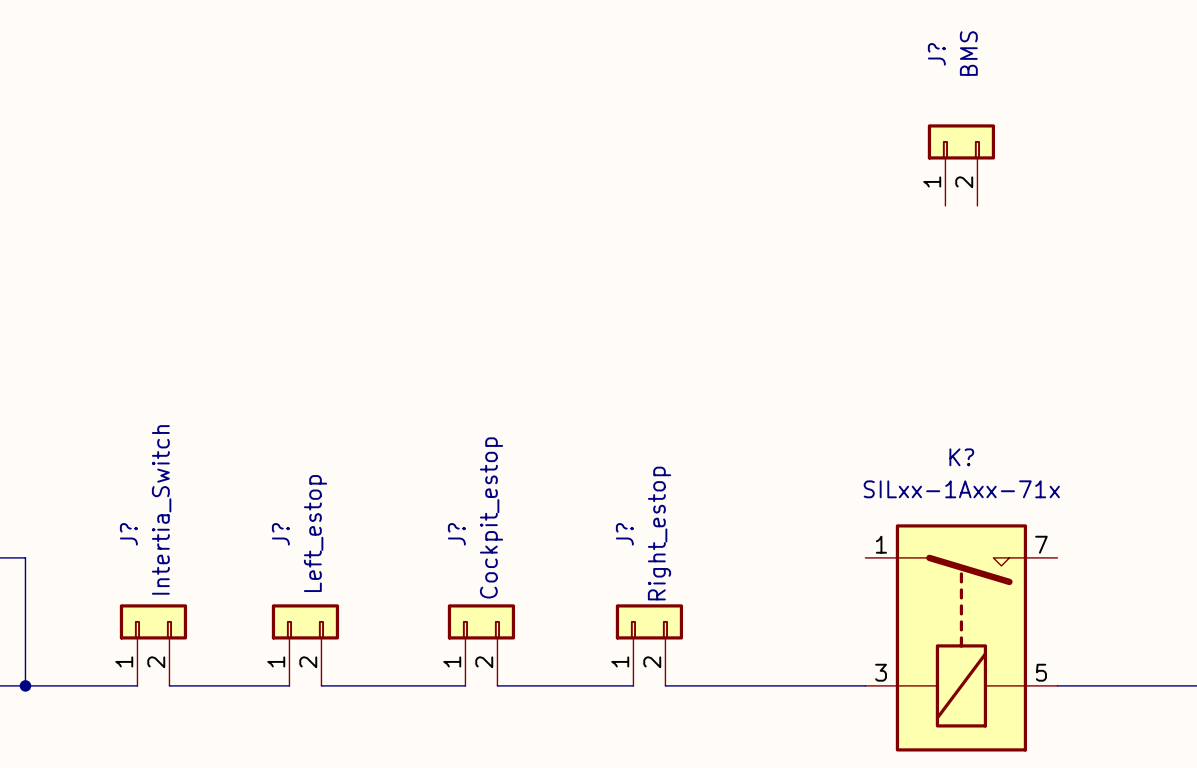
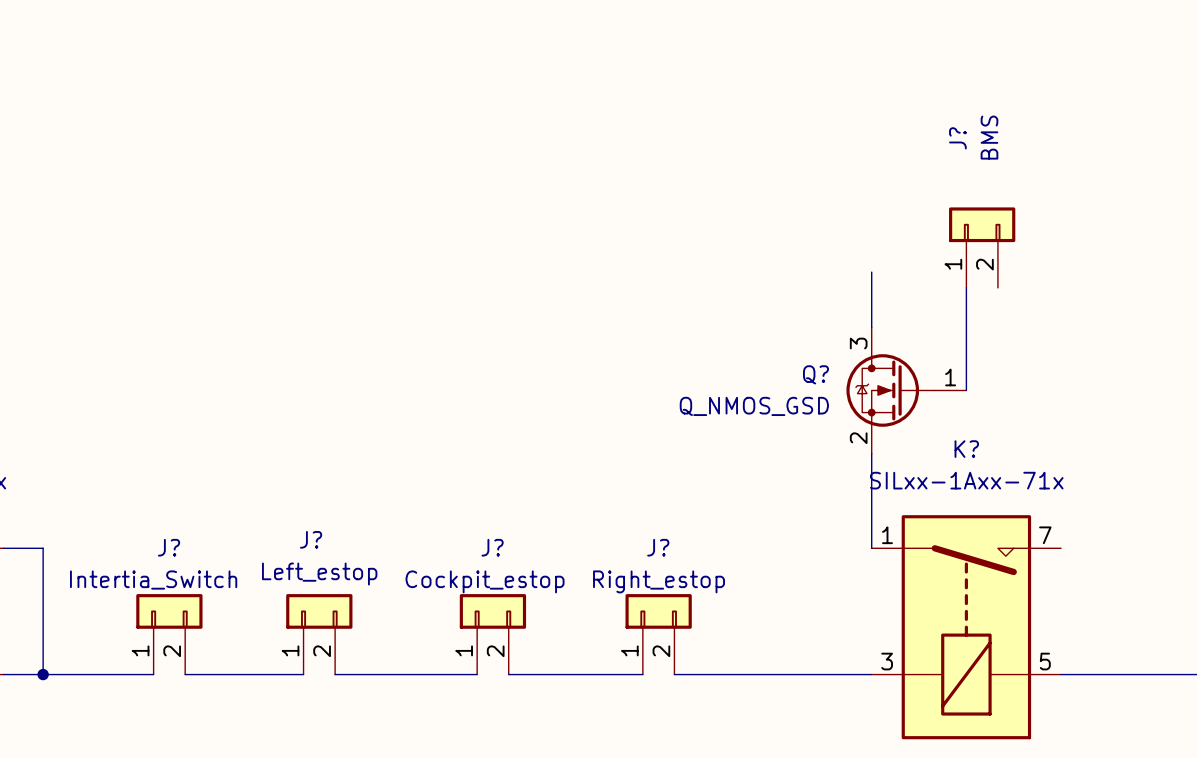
J? position: (961, 165) -> (982, 247)
wire: none -> (871, 272) (871, 327)
wire: none -> (966, 287) (966, 390)
Q?: none -> Q_NMOS_GSD (906, 390)
wire: none -> (871, 453) (871, 548)
J? value rotation: 0° (161, 509) -> 90° clockwise (153, 580)
J? value rotation: 0° (491, 517) -> 90° clockwise (485, 581)
J? value rotation: 0° (315, 533) -> 90° clockwise (319, 574)
J? value rotation: 0° (659, 533) -> 90° clockwise (659, 581)
J? name rotation: 0° (128, 534) -> 90° clockwise (169, 547)
J? name rotation: 0° (280, 534) -> 90° clockwise (311, 539)
J? name rotation: 0° (456, 534) -> 90° clockwise (492, 547)
J? name rotation: 0° (624, 534) -> 90° clockwise (658, 547)

